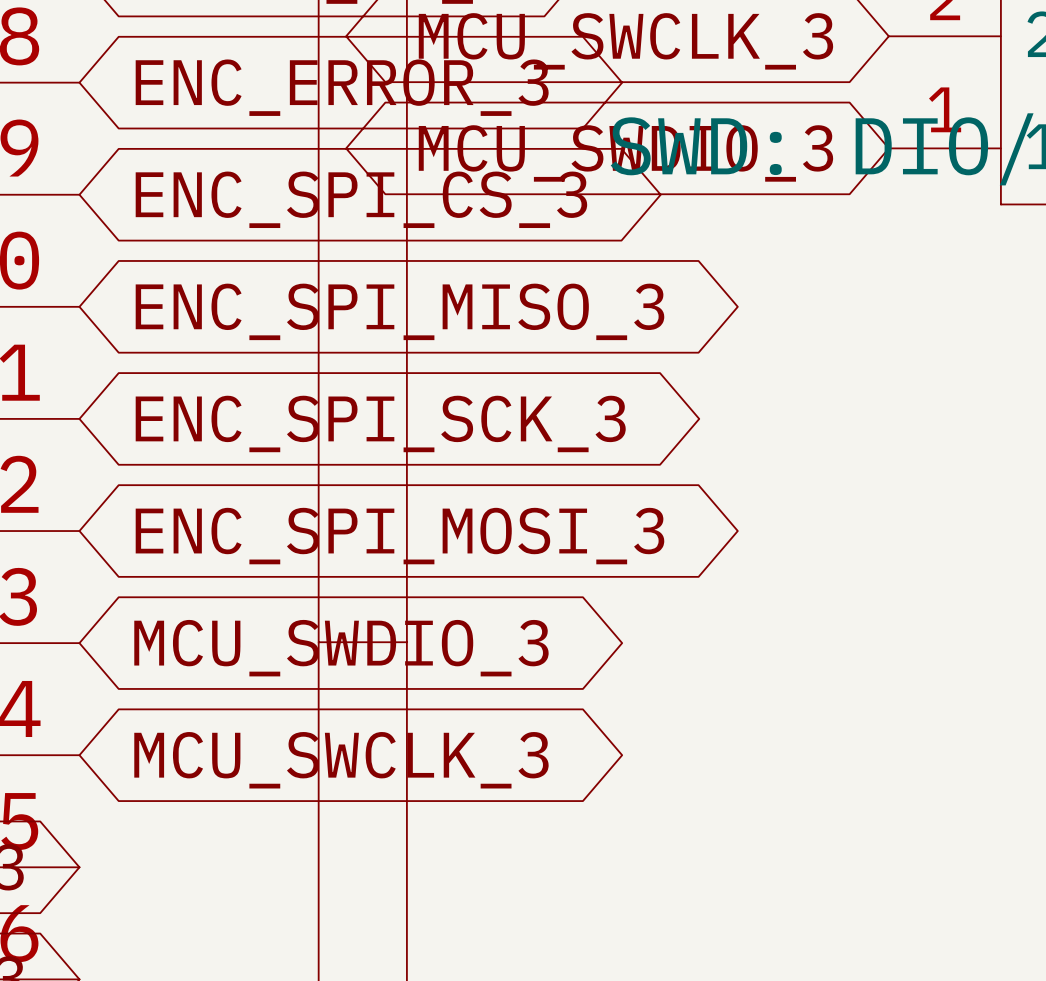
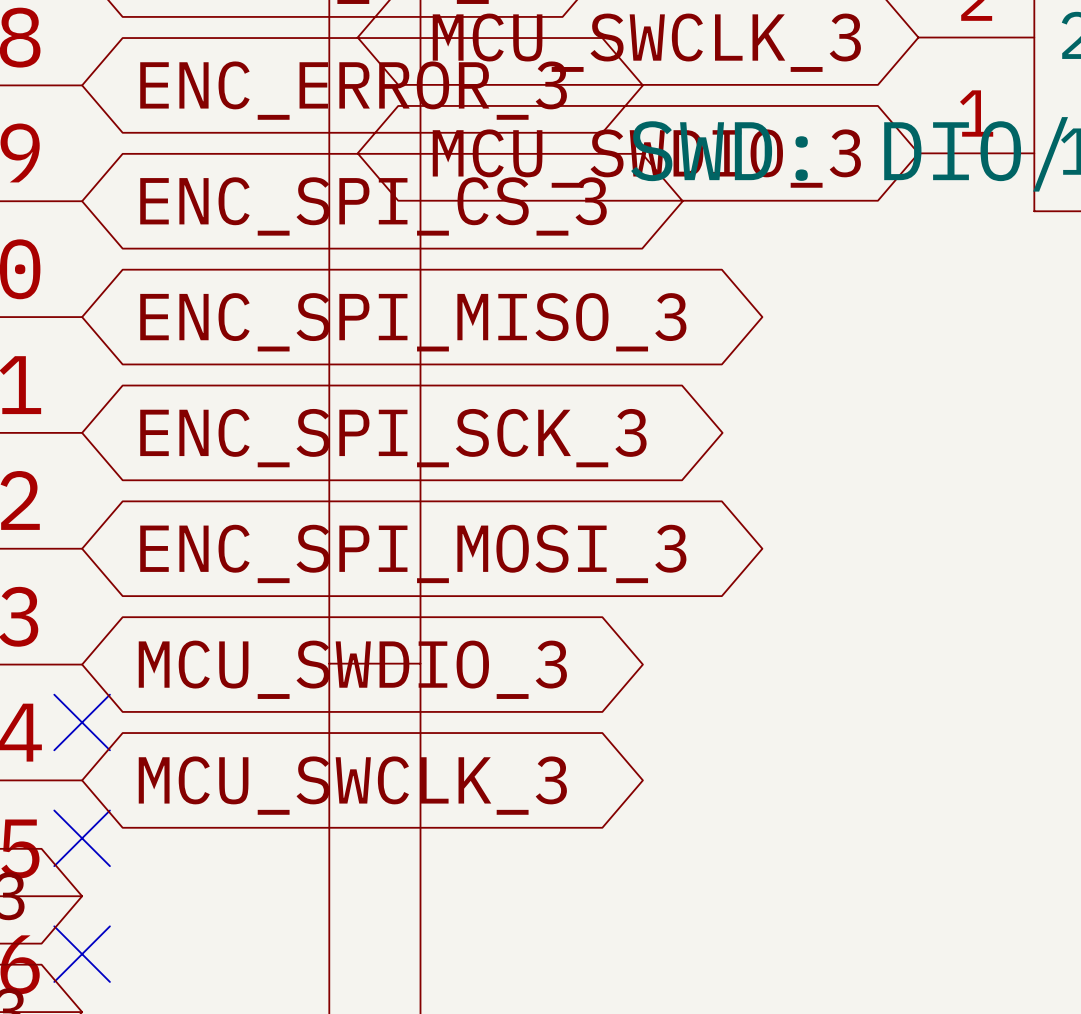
no-connect mark: none -> (82, 722)
no-connect mark: none -> (82, 838)
no-connect mark: none -> (82, 954)

